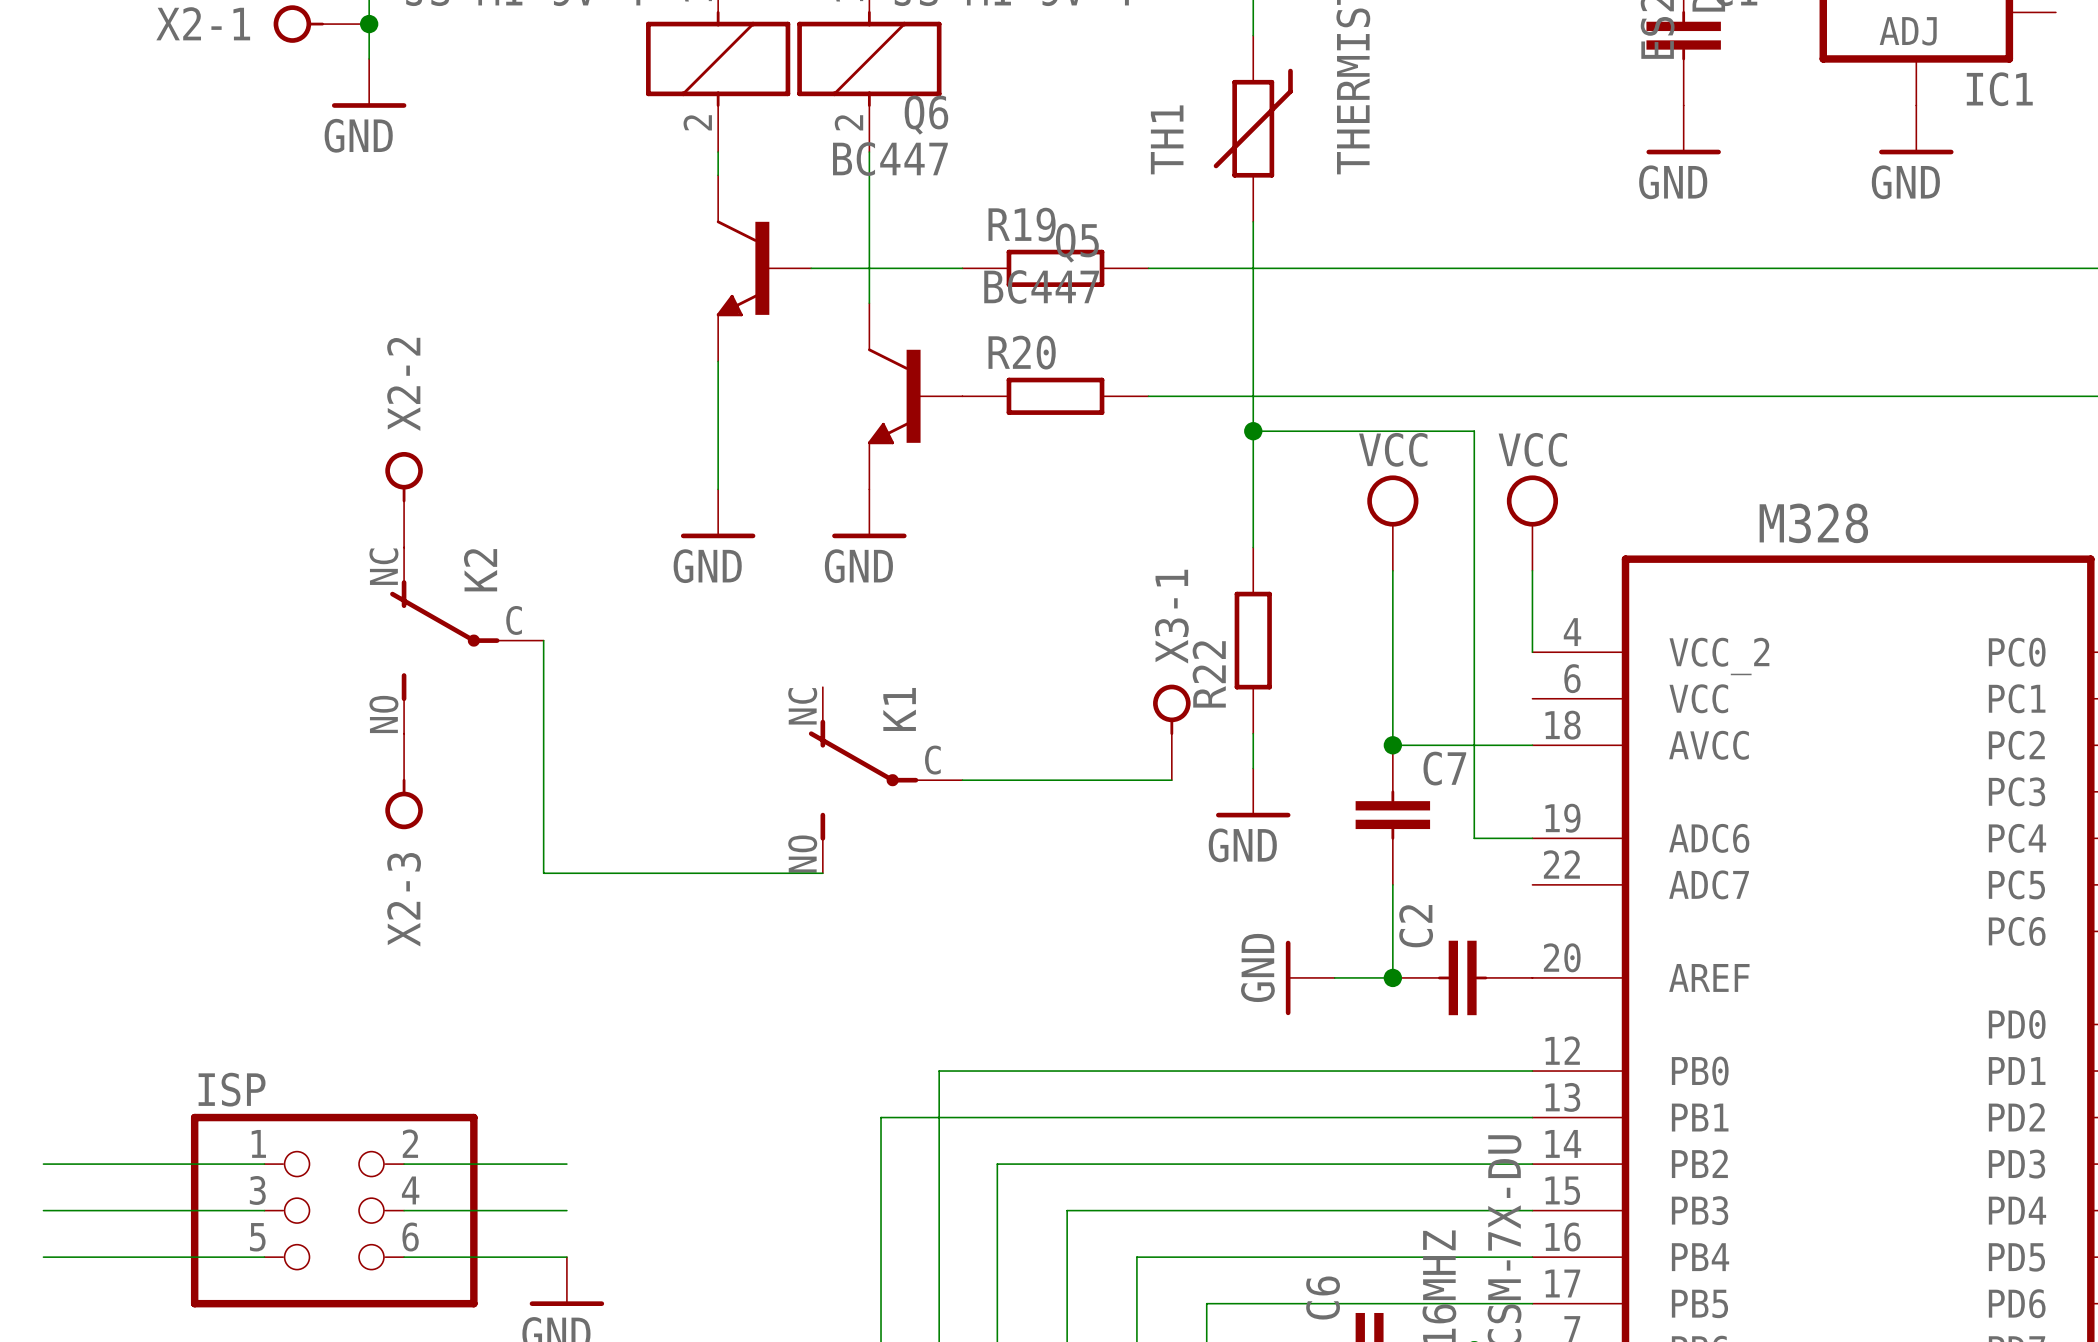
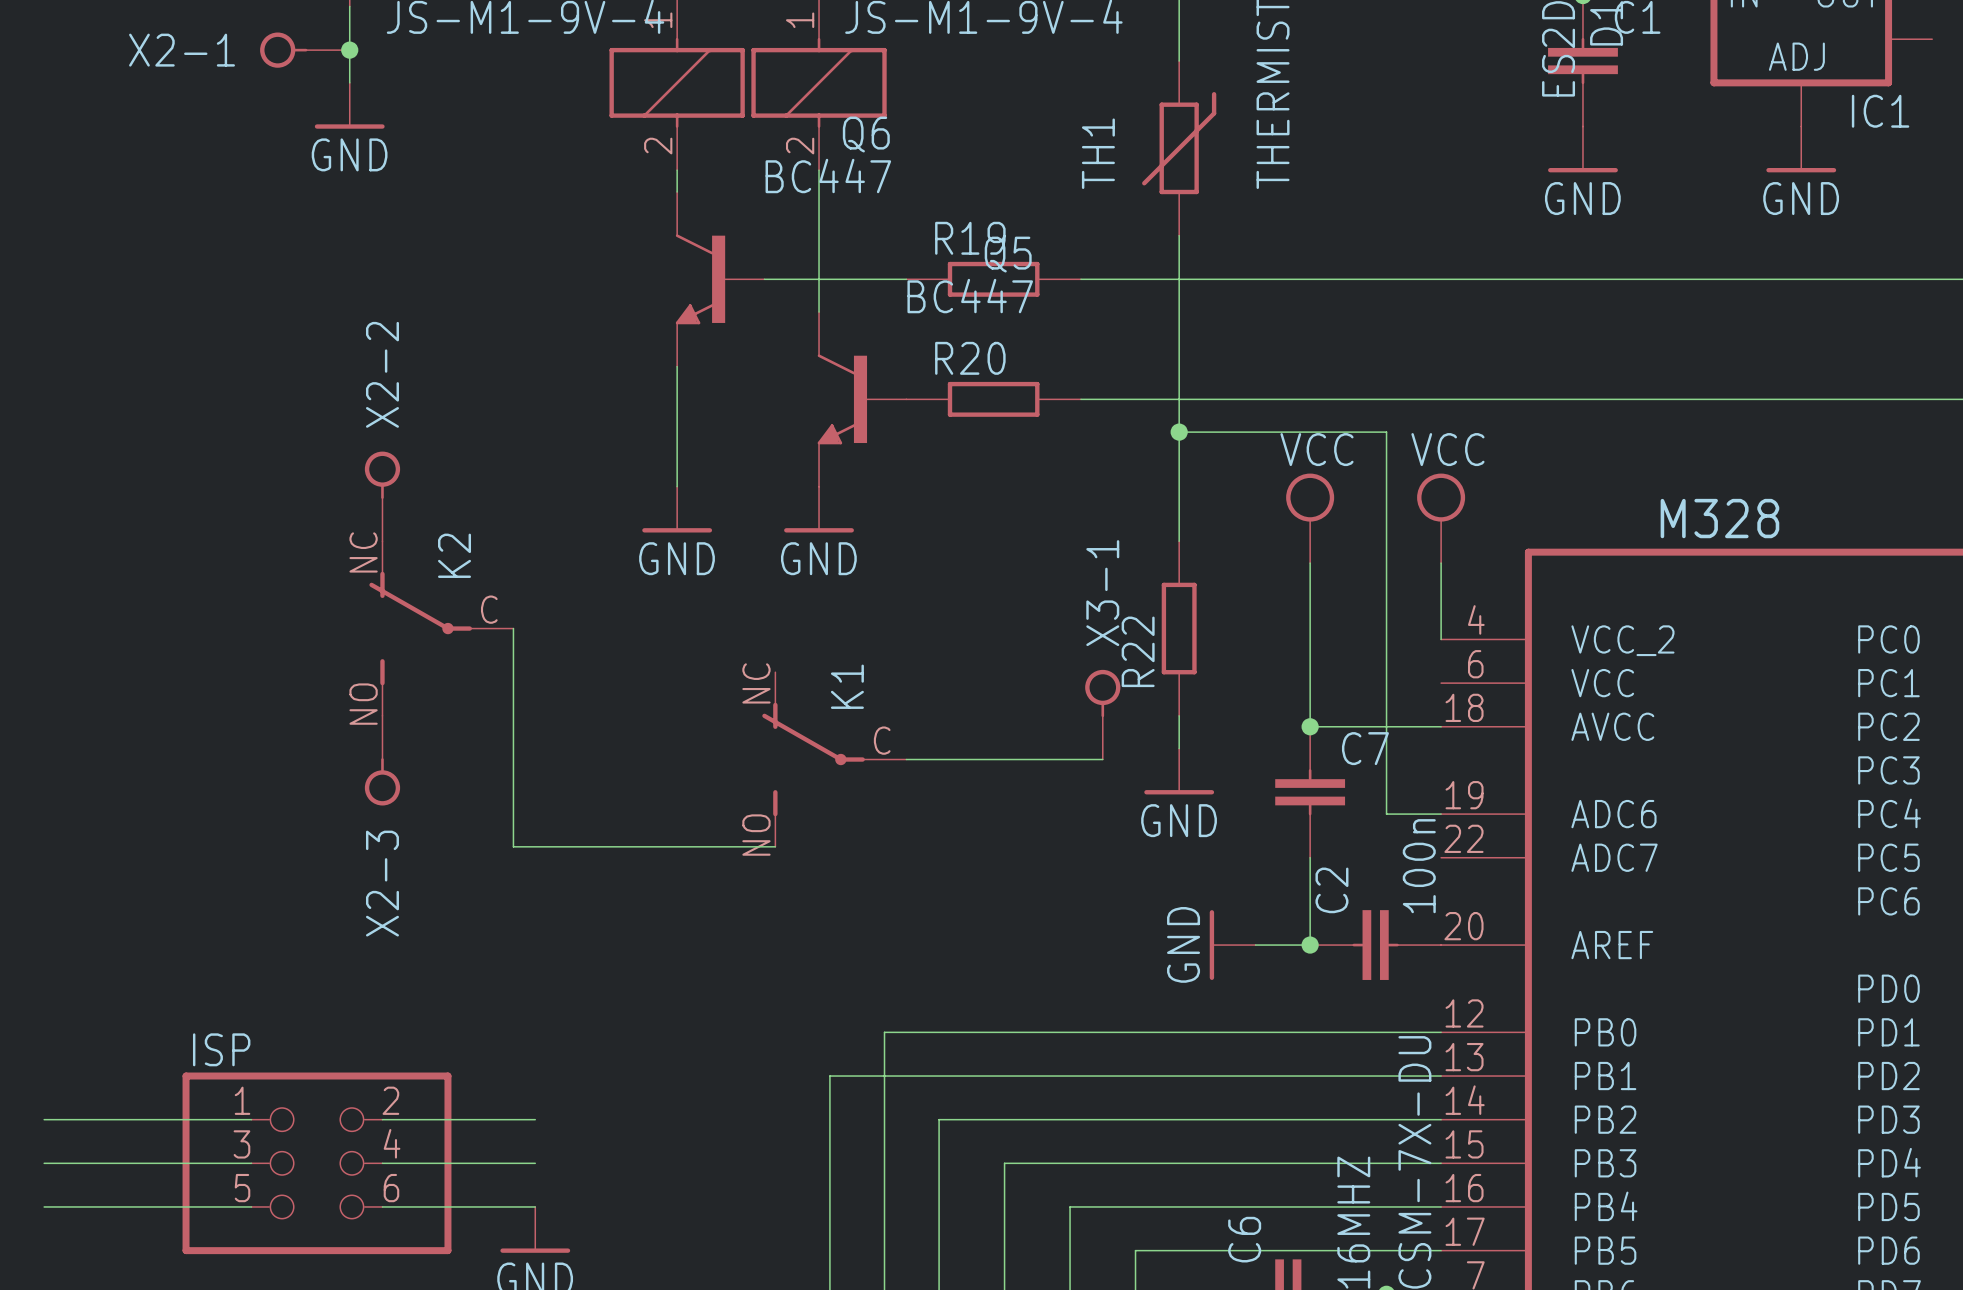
C2 value: none -> 100n (1419, 866)

